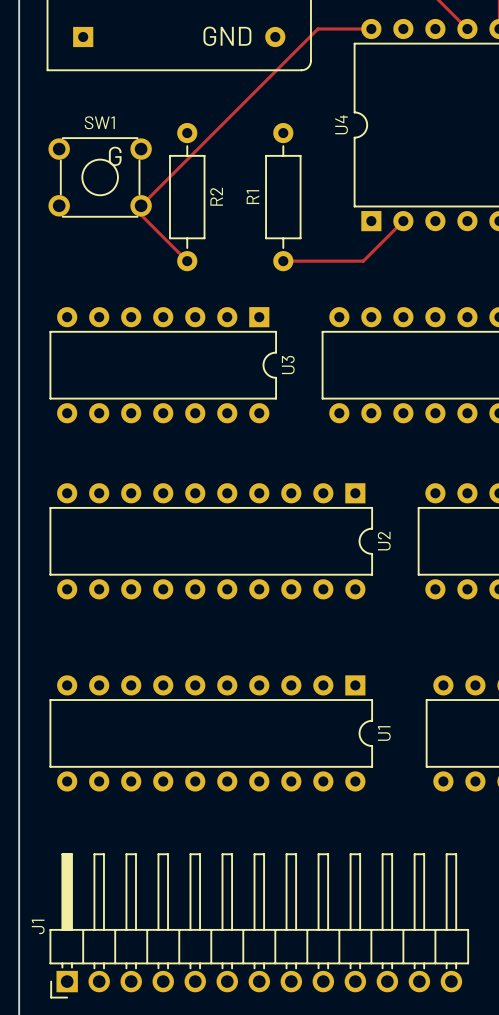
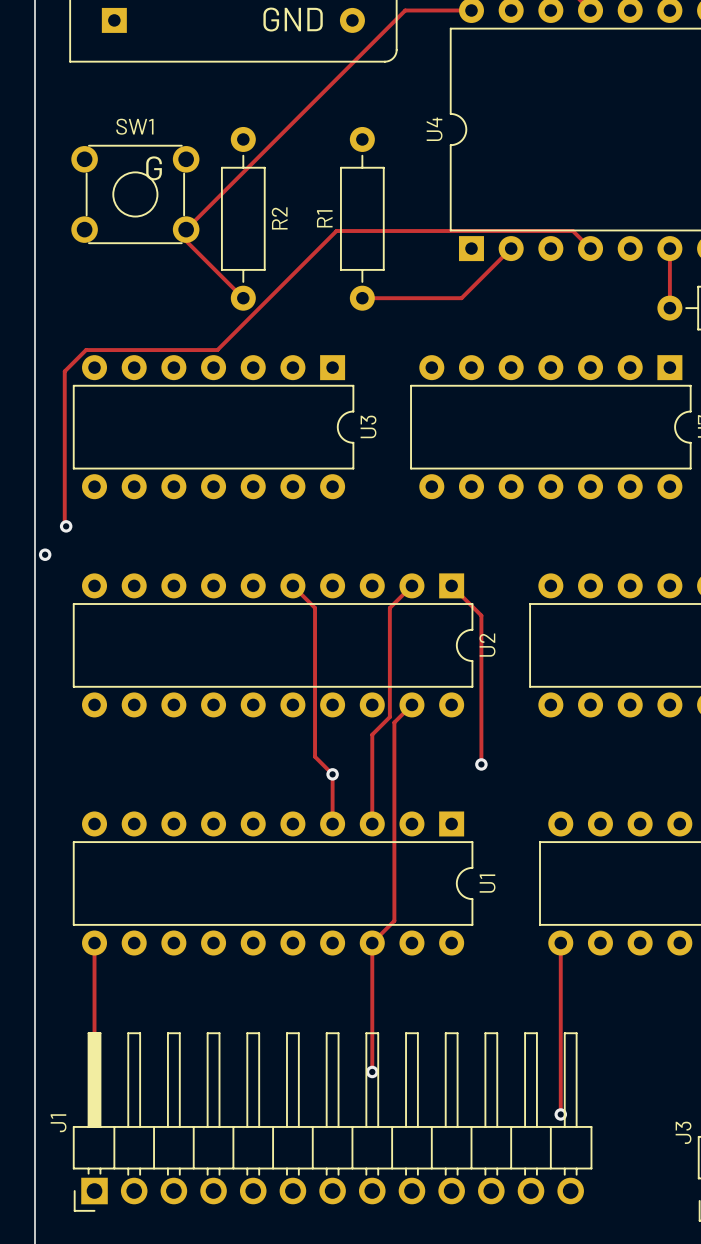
track: none -> (590, 248) (572, 231) (336, 231) (217, 350) (86, 350) (64, 371) (66, 526)
via: none -> (66, 526)
via: none -> (45, 554)
track: none -> (292, 585) (315, 607) (315, 756) (332, 774) (332, 823)
track: none -> (411, 585) (389, 607) (389, 717) (372, 734) (372, 823)
track: none -> (451, 585) (481, 615) (481, 764)
track: none -> (411, 704) (394, 722) (394, 920) (372, 943) (372, 1071)
via: none -> (481, 764)
via: none -> (332, 774)
track: none -> (94, 943) (94, 1101)
track: none -> (560, 943) (560, 1114)
via: none -> (372, 1071)
via: none -> (560, 1114)

